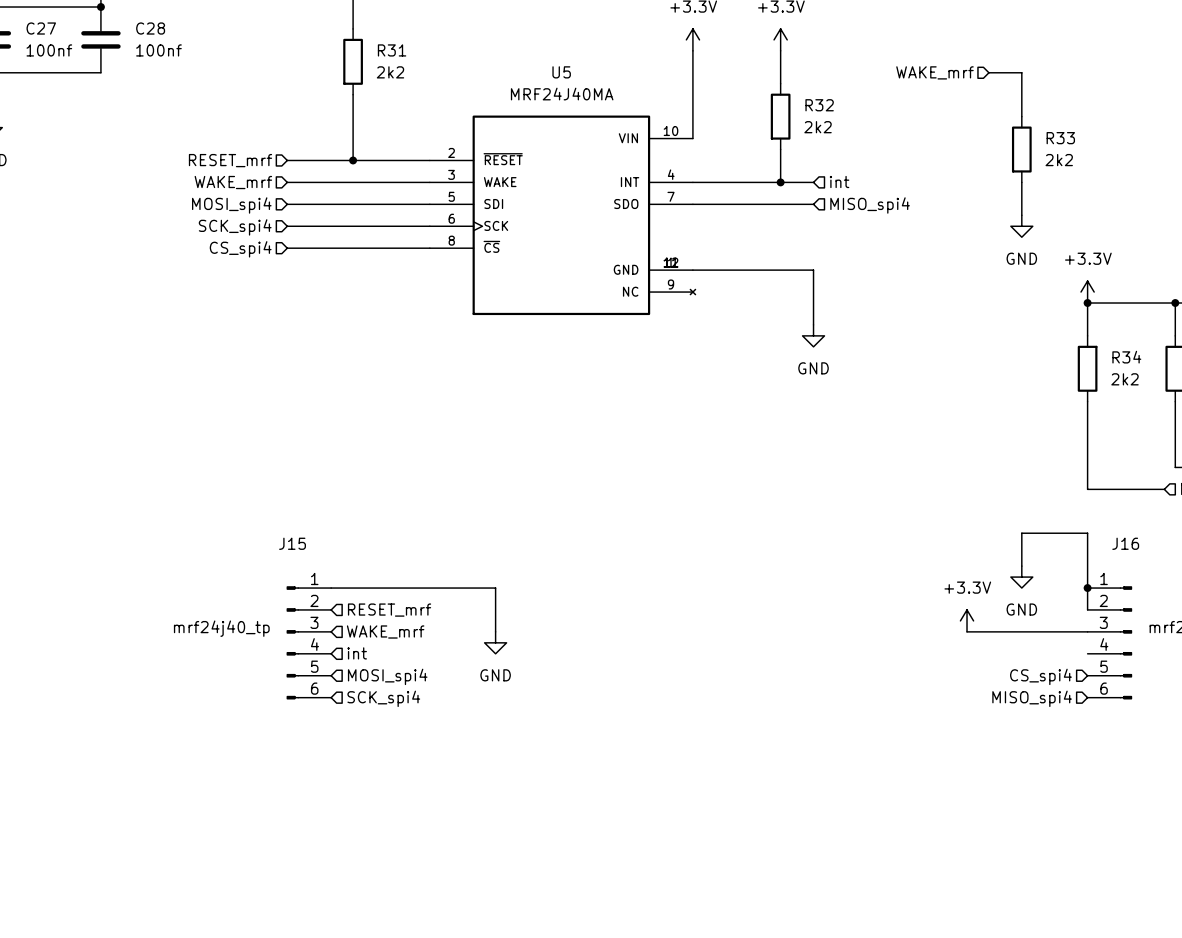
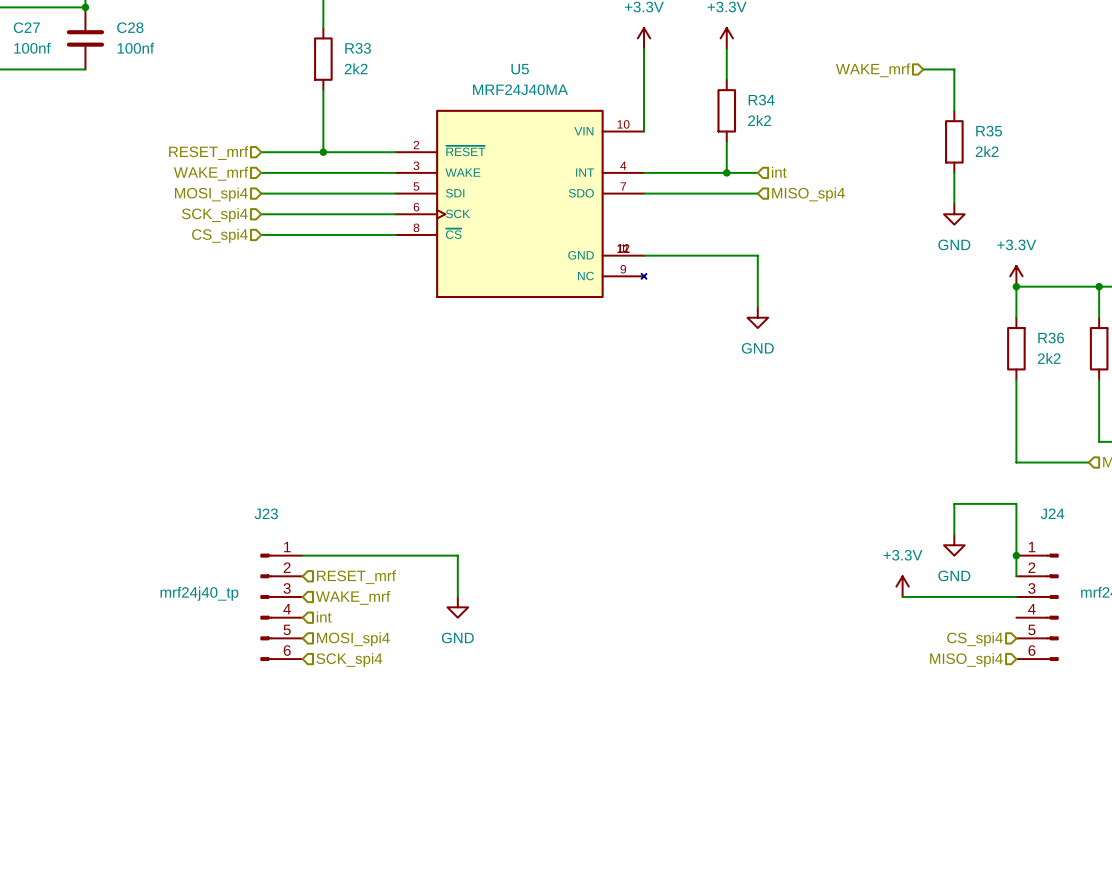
R31 name: R31 (392, 50) -> R33 (358, 48)
R32 name: R32 (819, 105) -> R34 (761, 100)
R33 name: R33 (1060, 138) -> R35 (989, 131)
R34 name: R34 (1126, 357) -> R36 (1051, 338)
J15 name: J15 (292, 543) -> J23 (266, 513)
J16 name: J16 (1125, 543) -> J24 (1052, 513)

